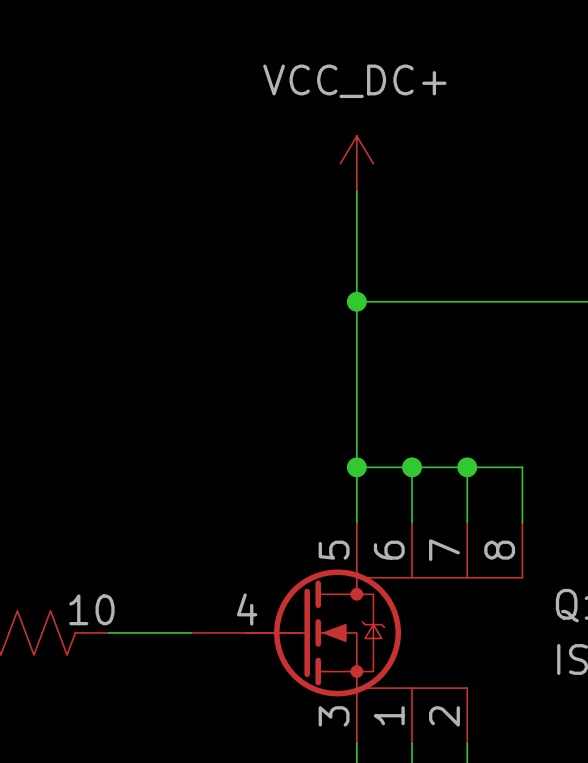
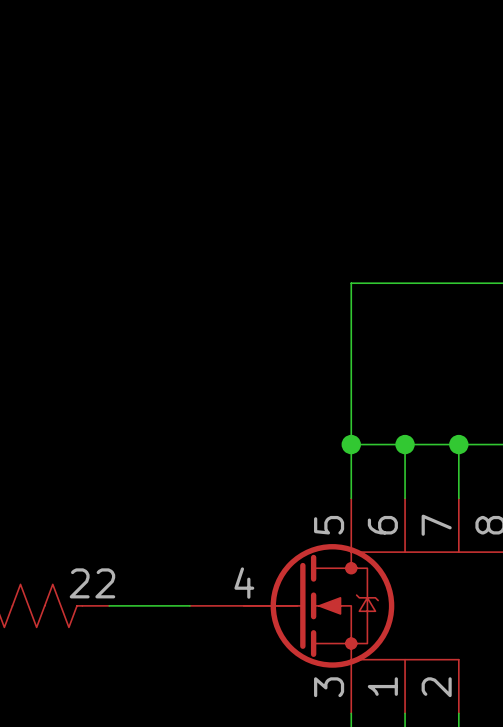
power symbol: VCC_DC+ (356, 163) -> none
wire: (356, 191) (356, 301) -> none
junction: (356, 301) -> none
part value: 10 (91, 609) -> 22 (92, 583)

